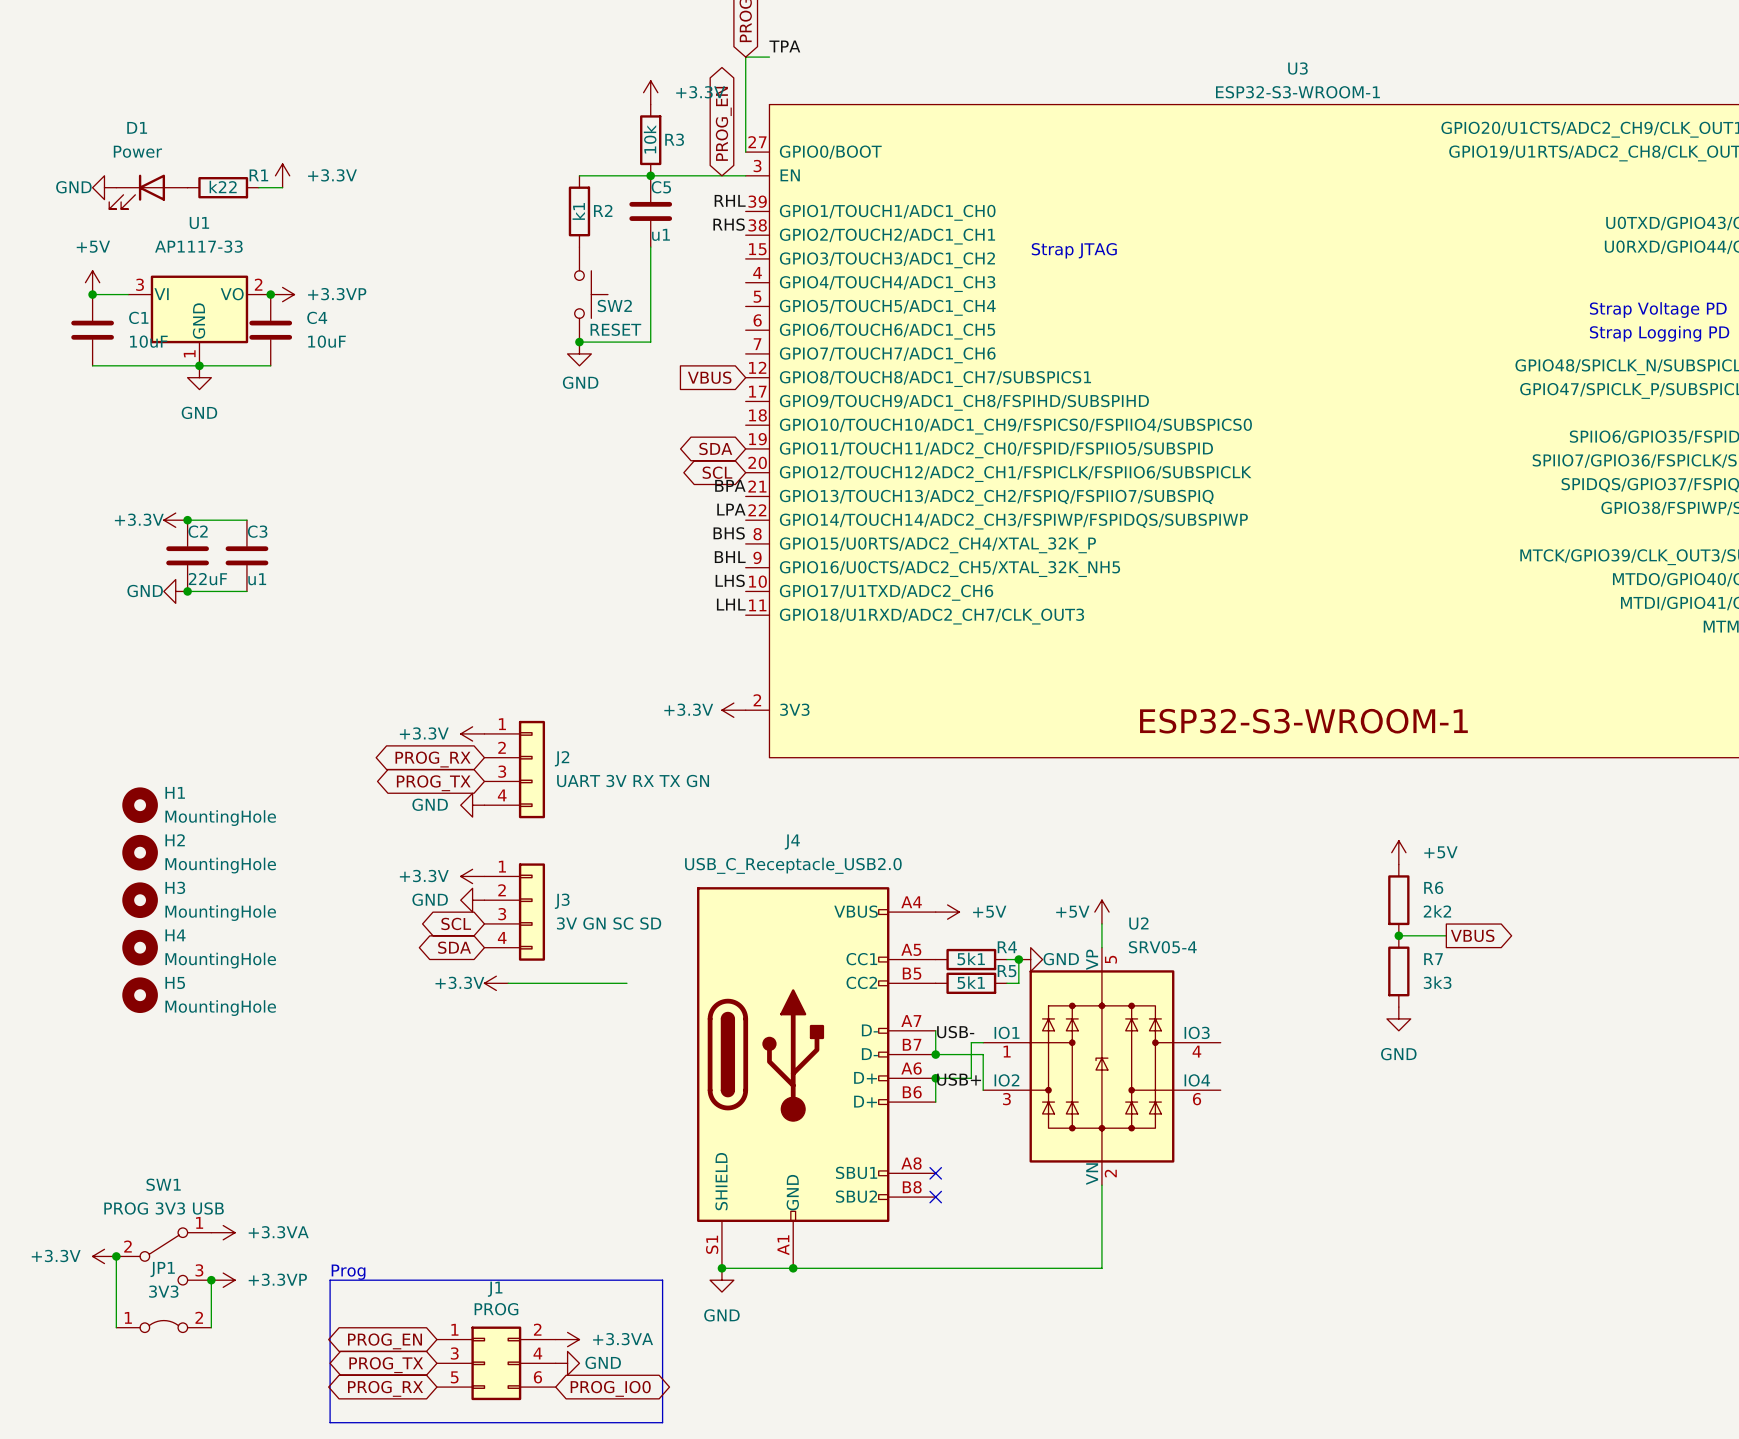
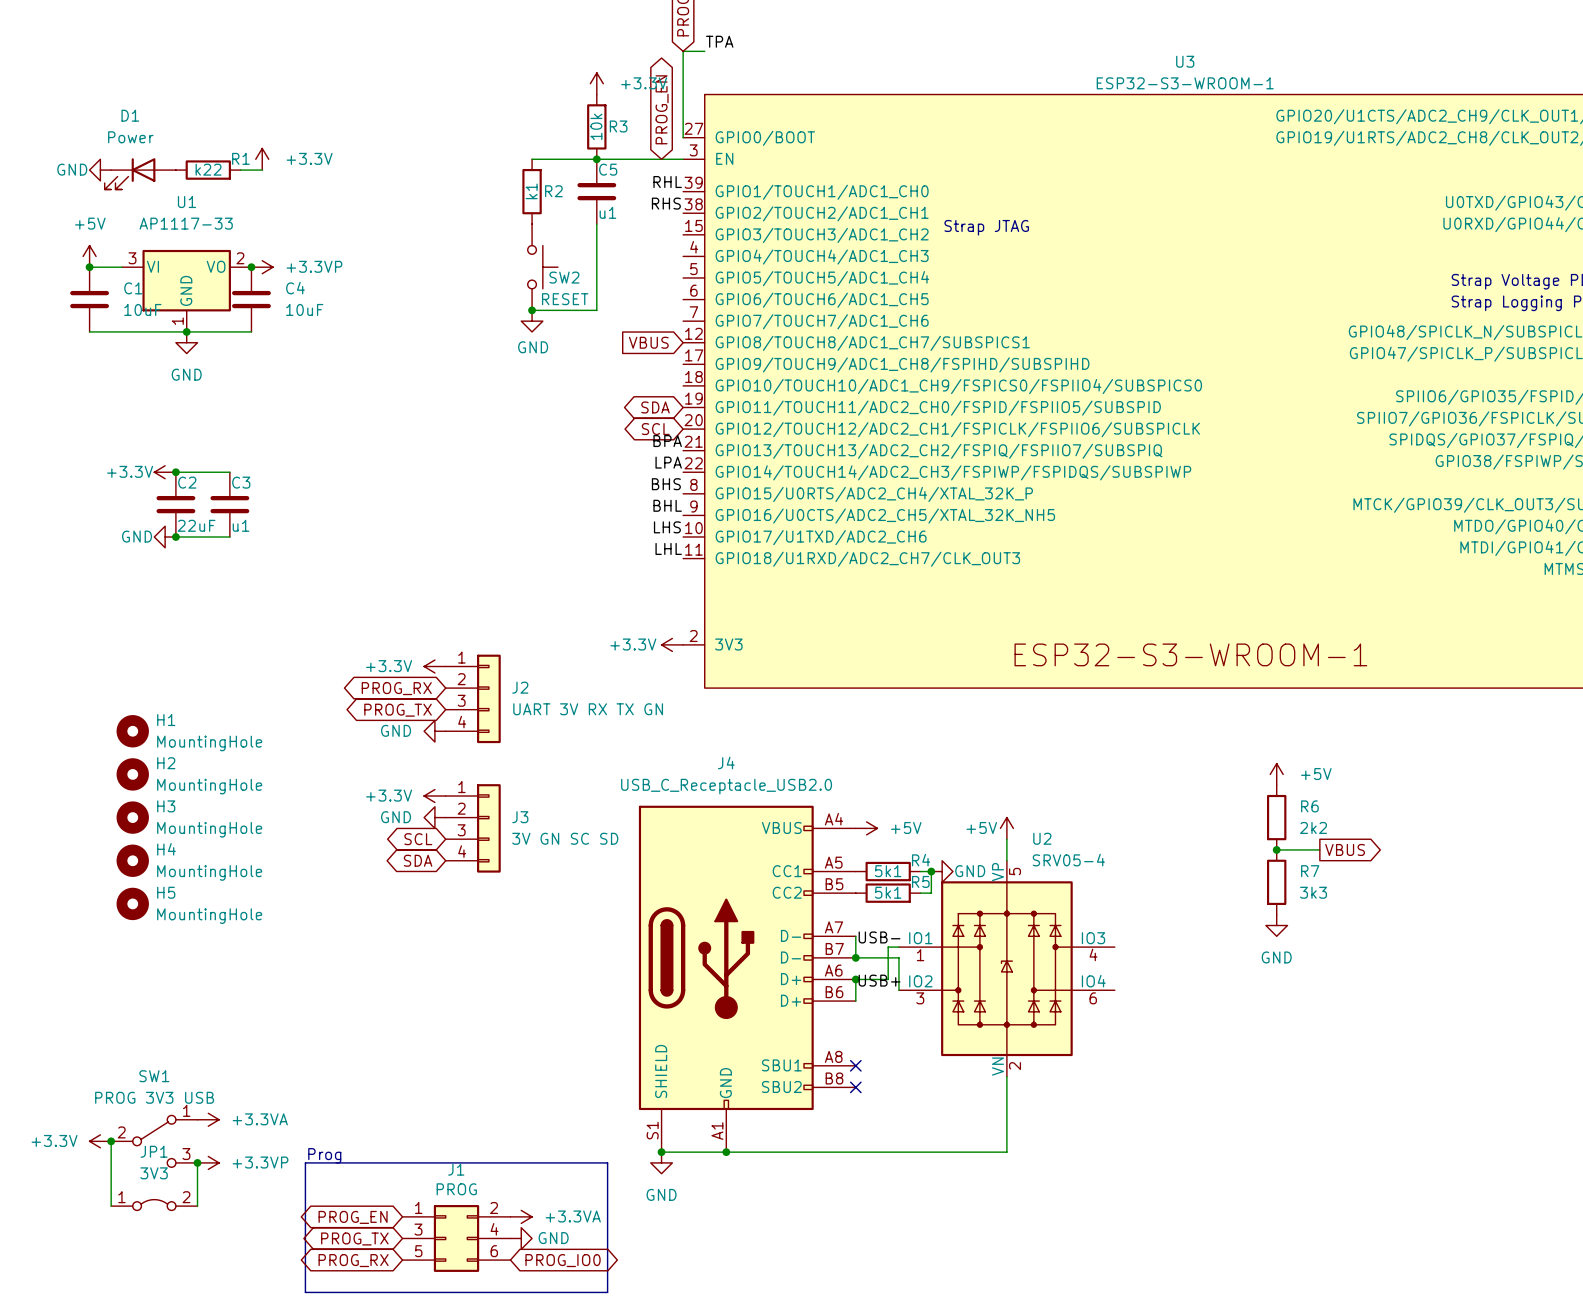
power symbol: +3.3V (496, 983) -> none
wire: (508, 983) (626, 983) -> none

